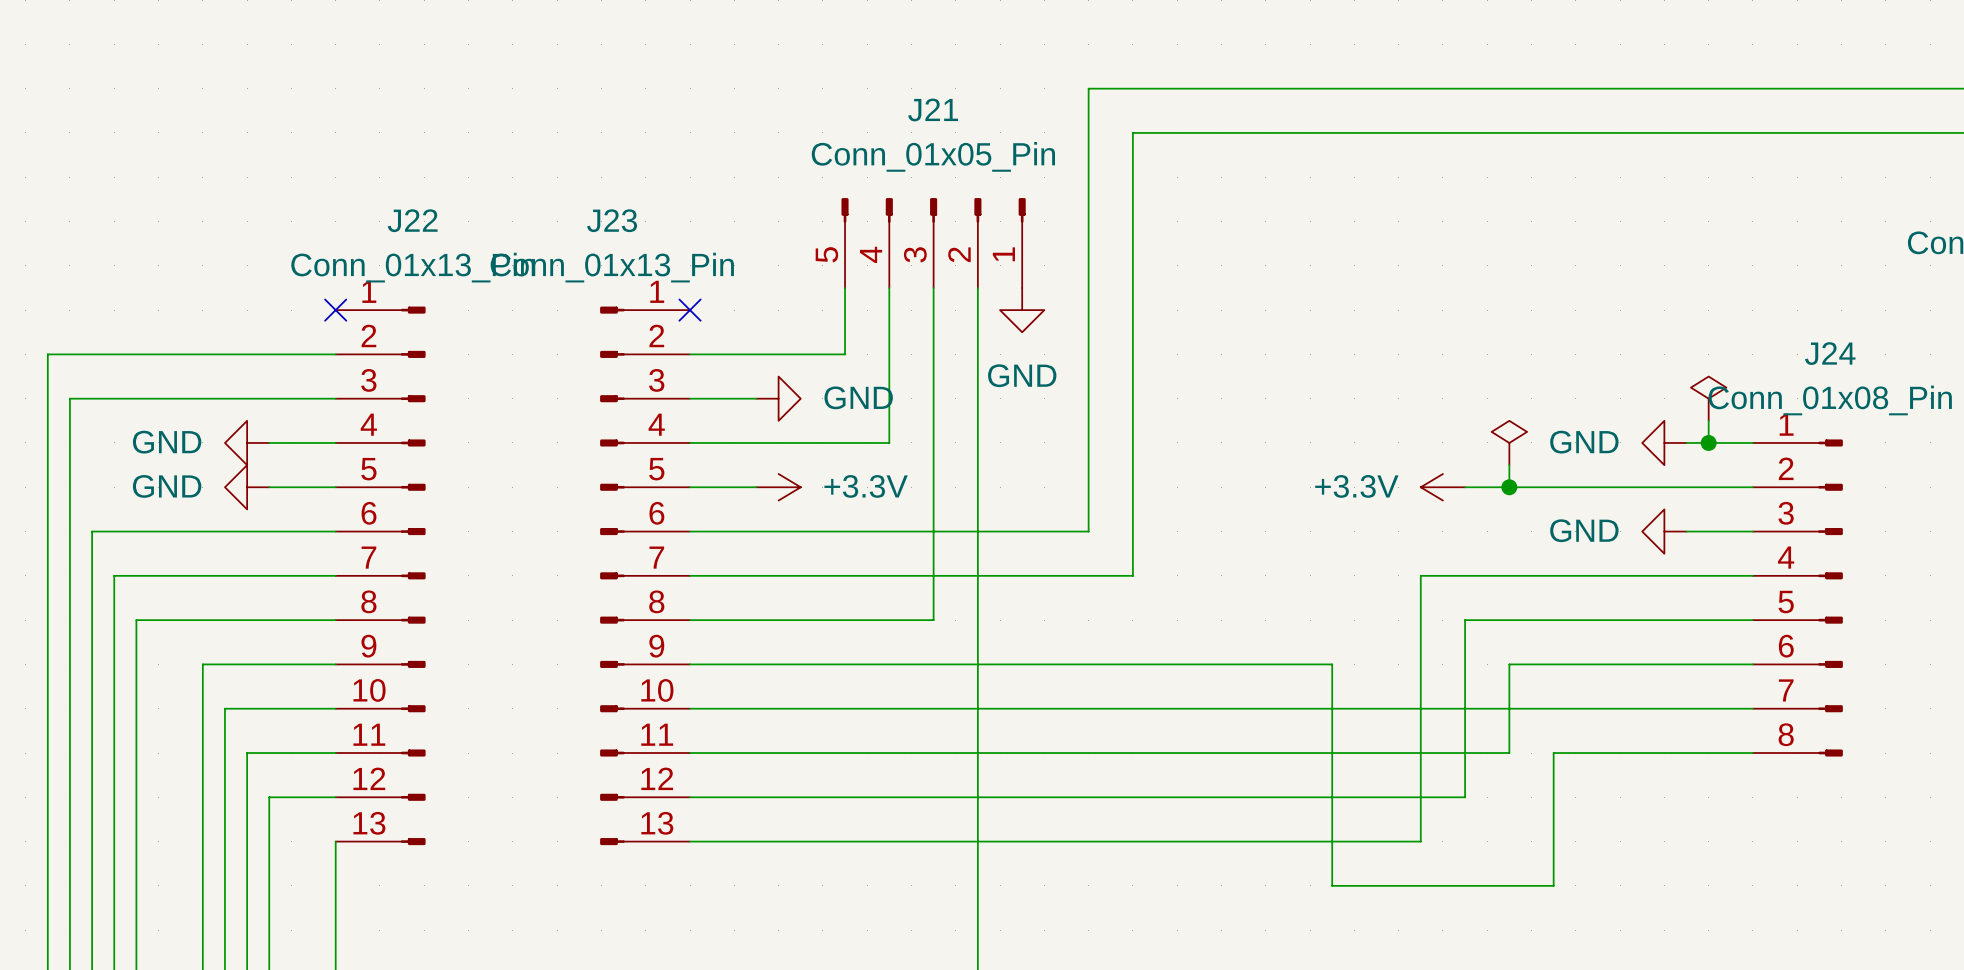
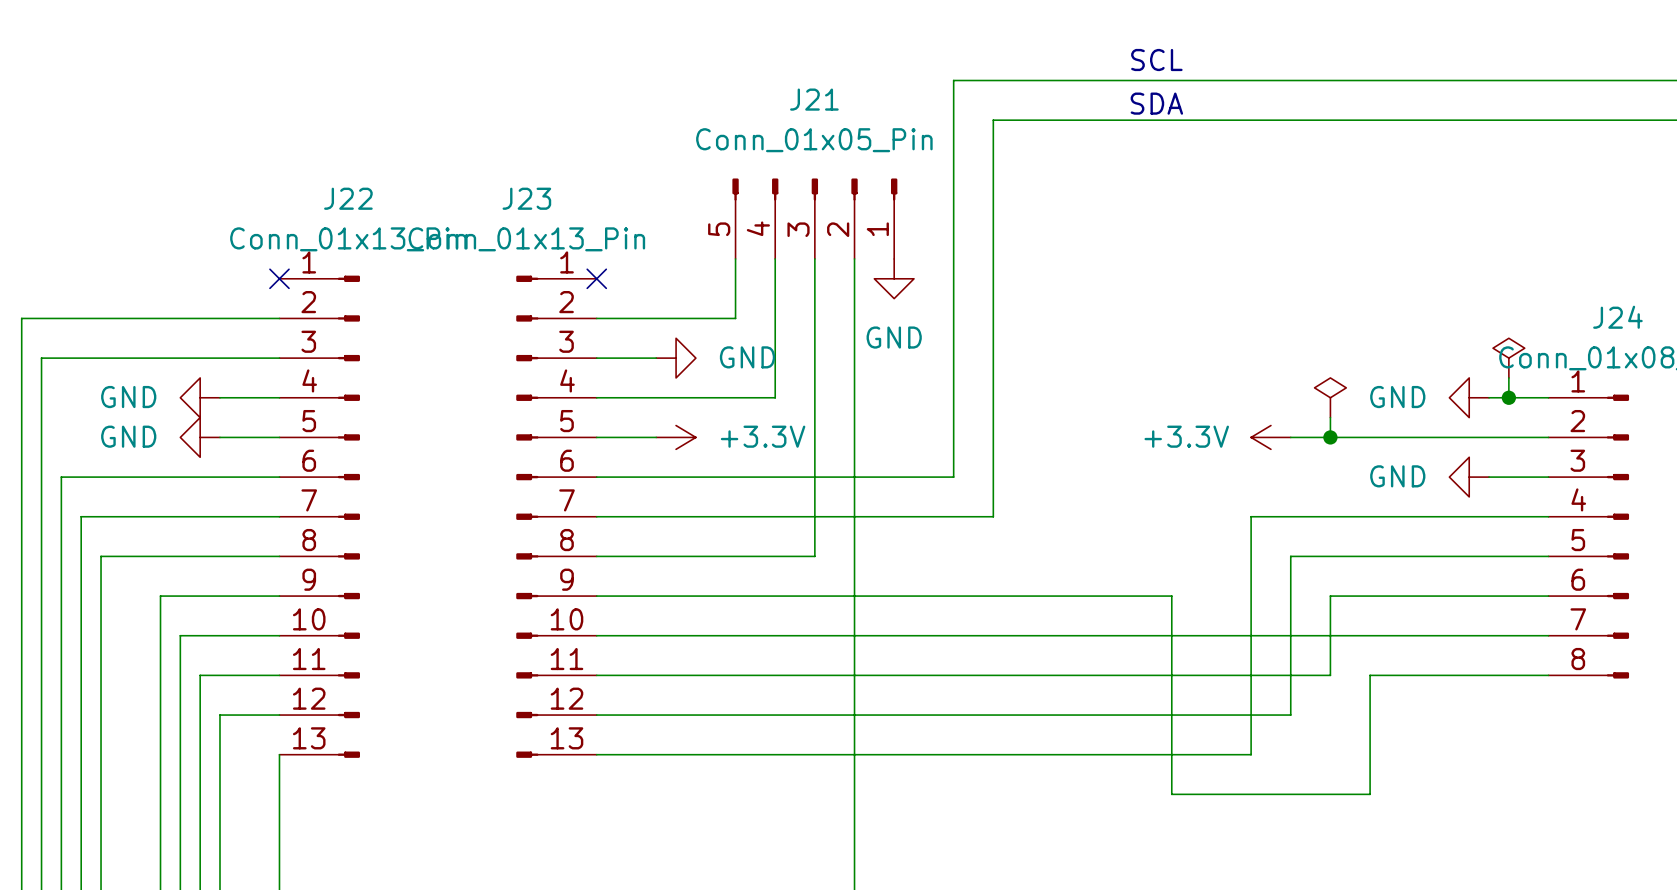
text: none -> SCL (1156, 60)
text: none -> SDA (1156, 103)

